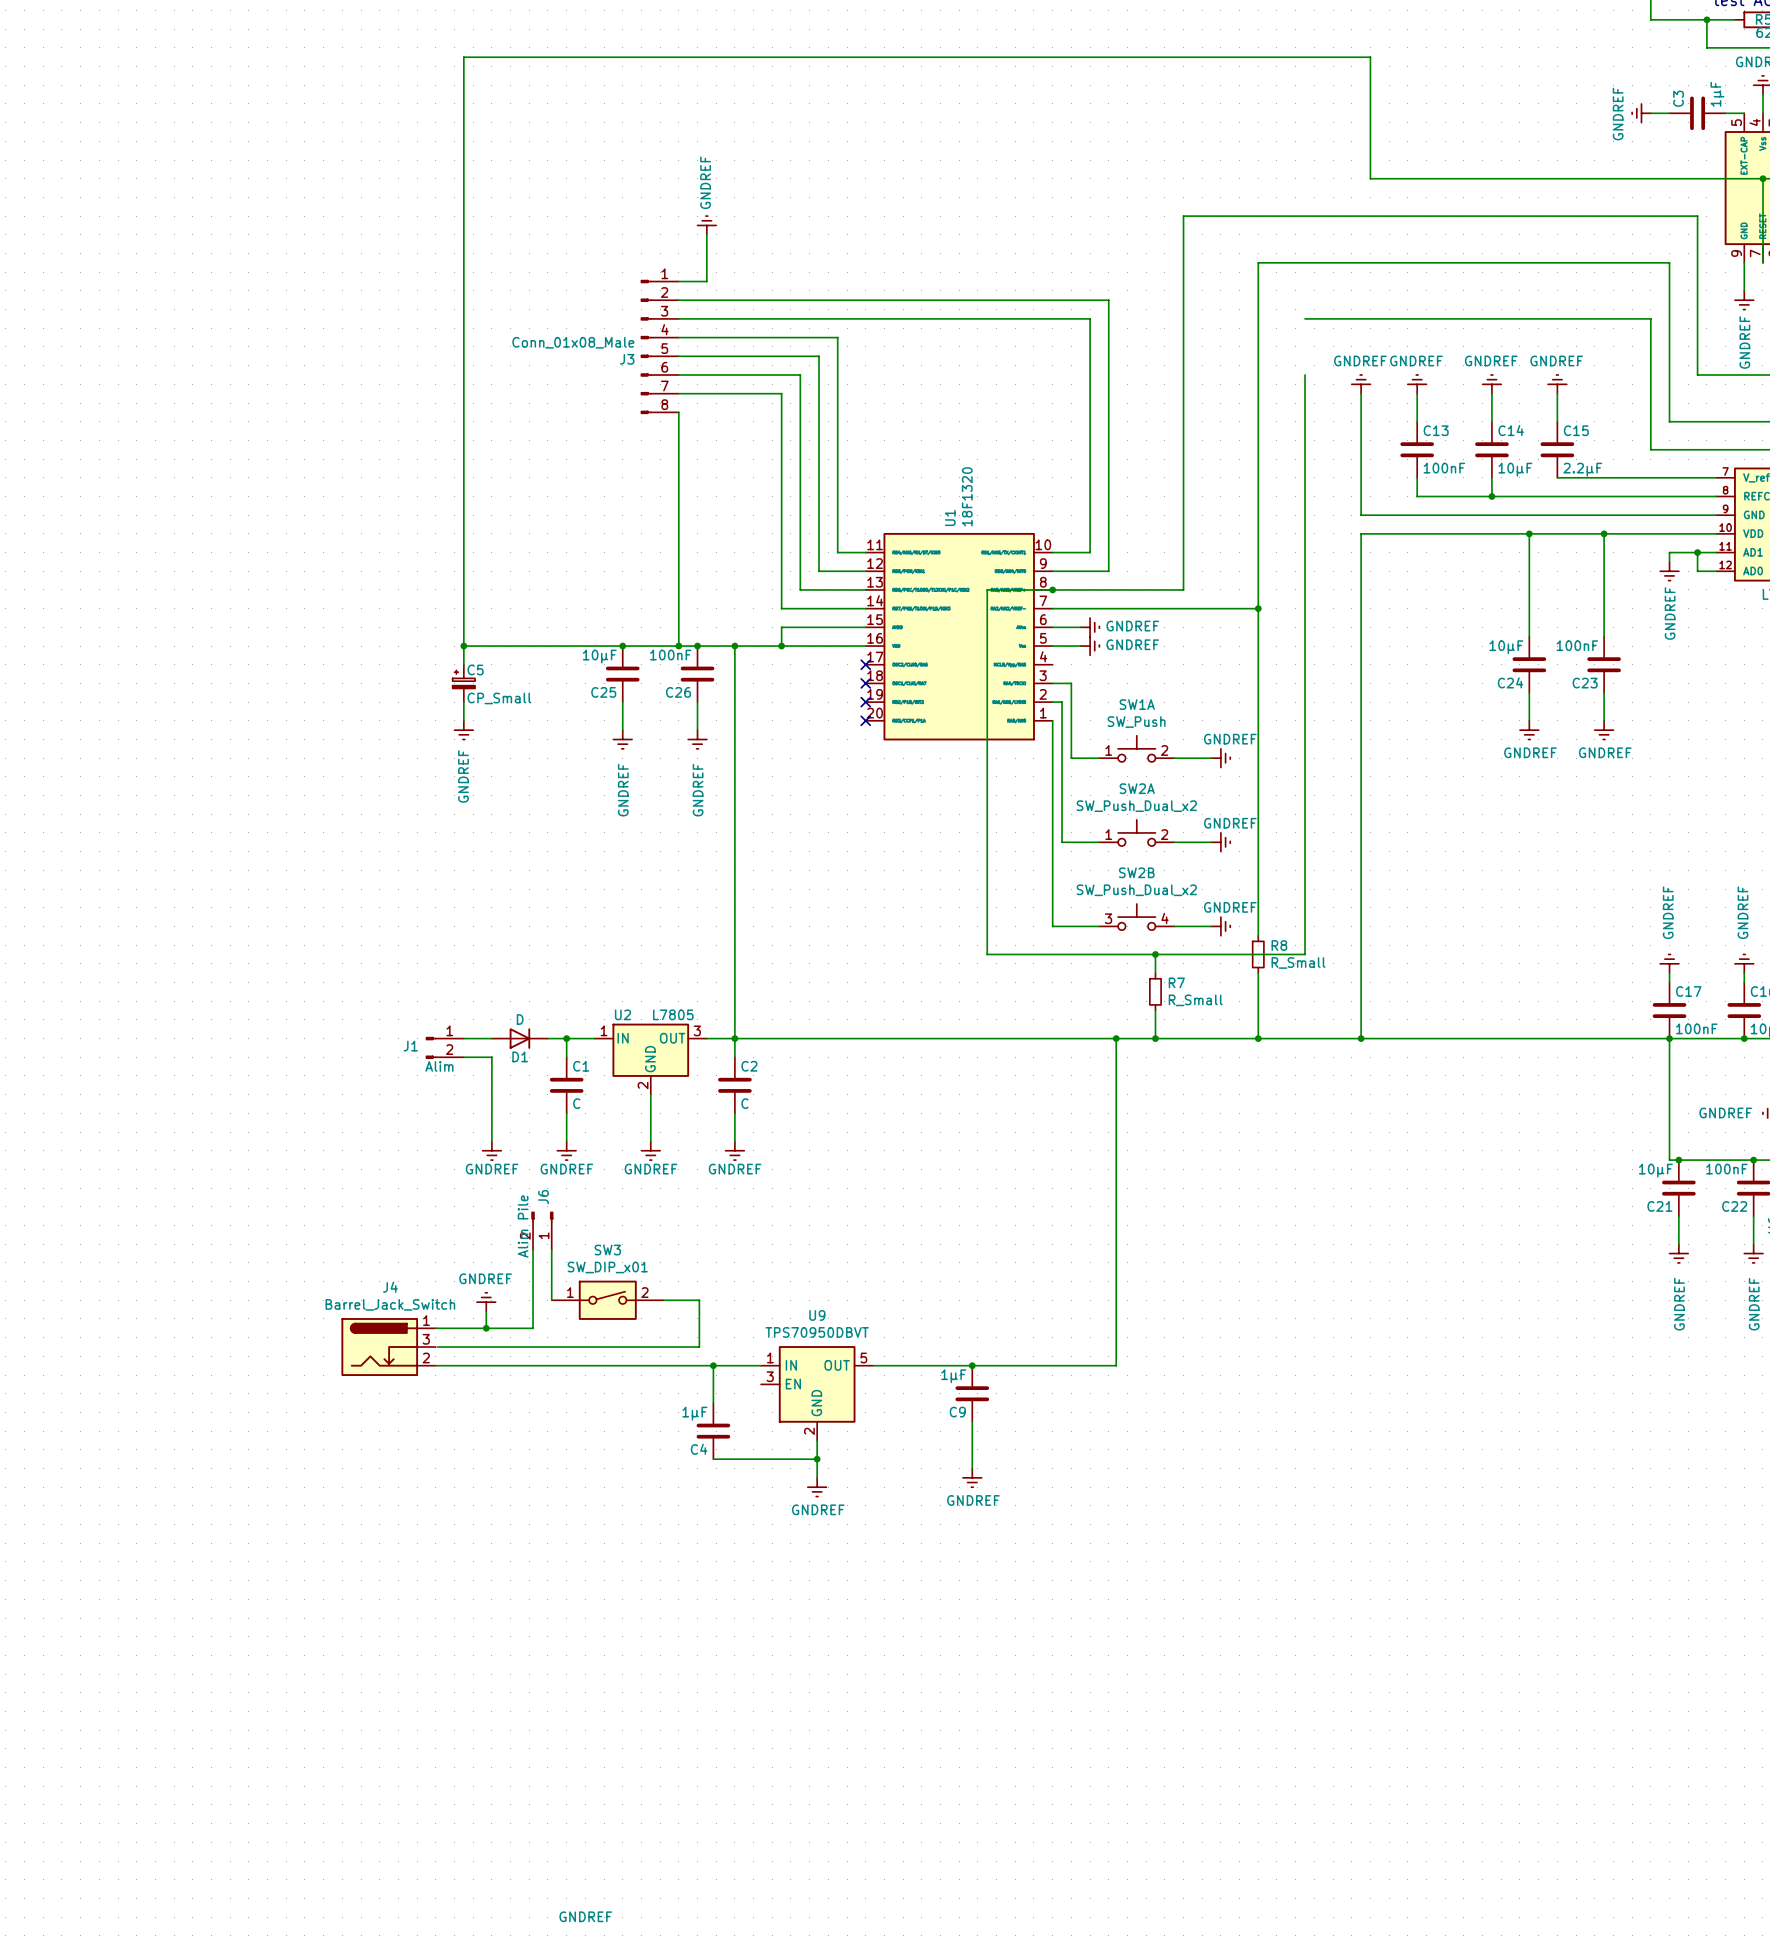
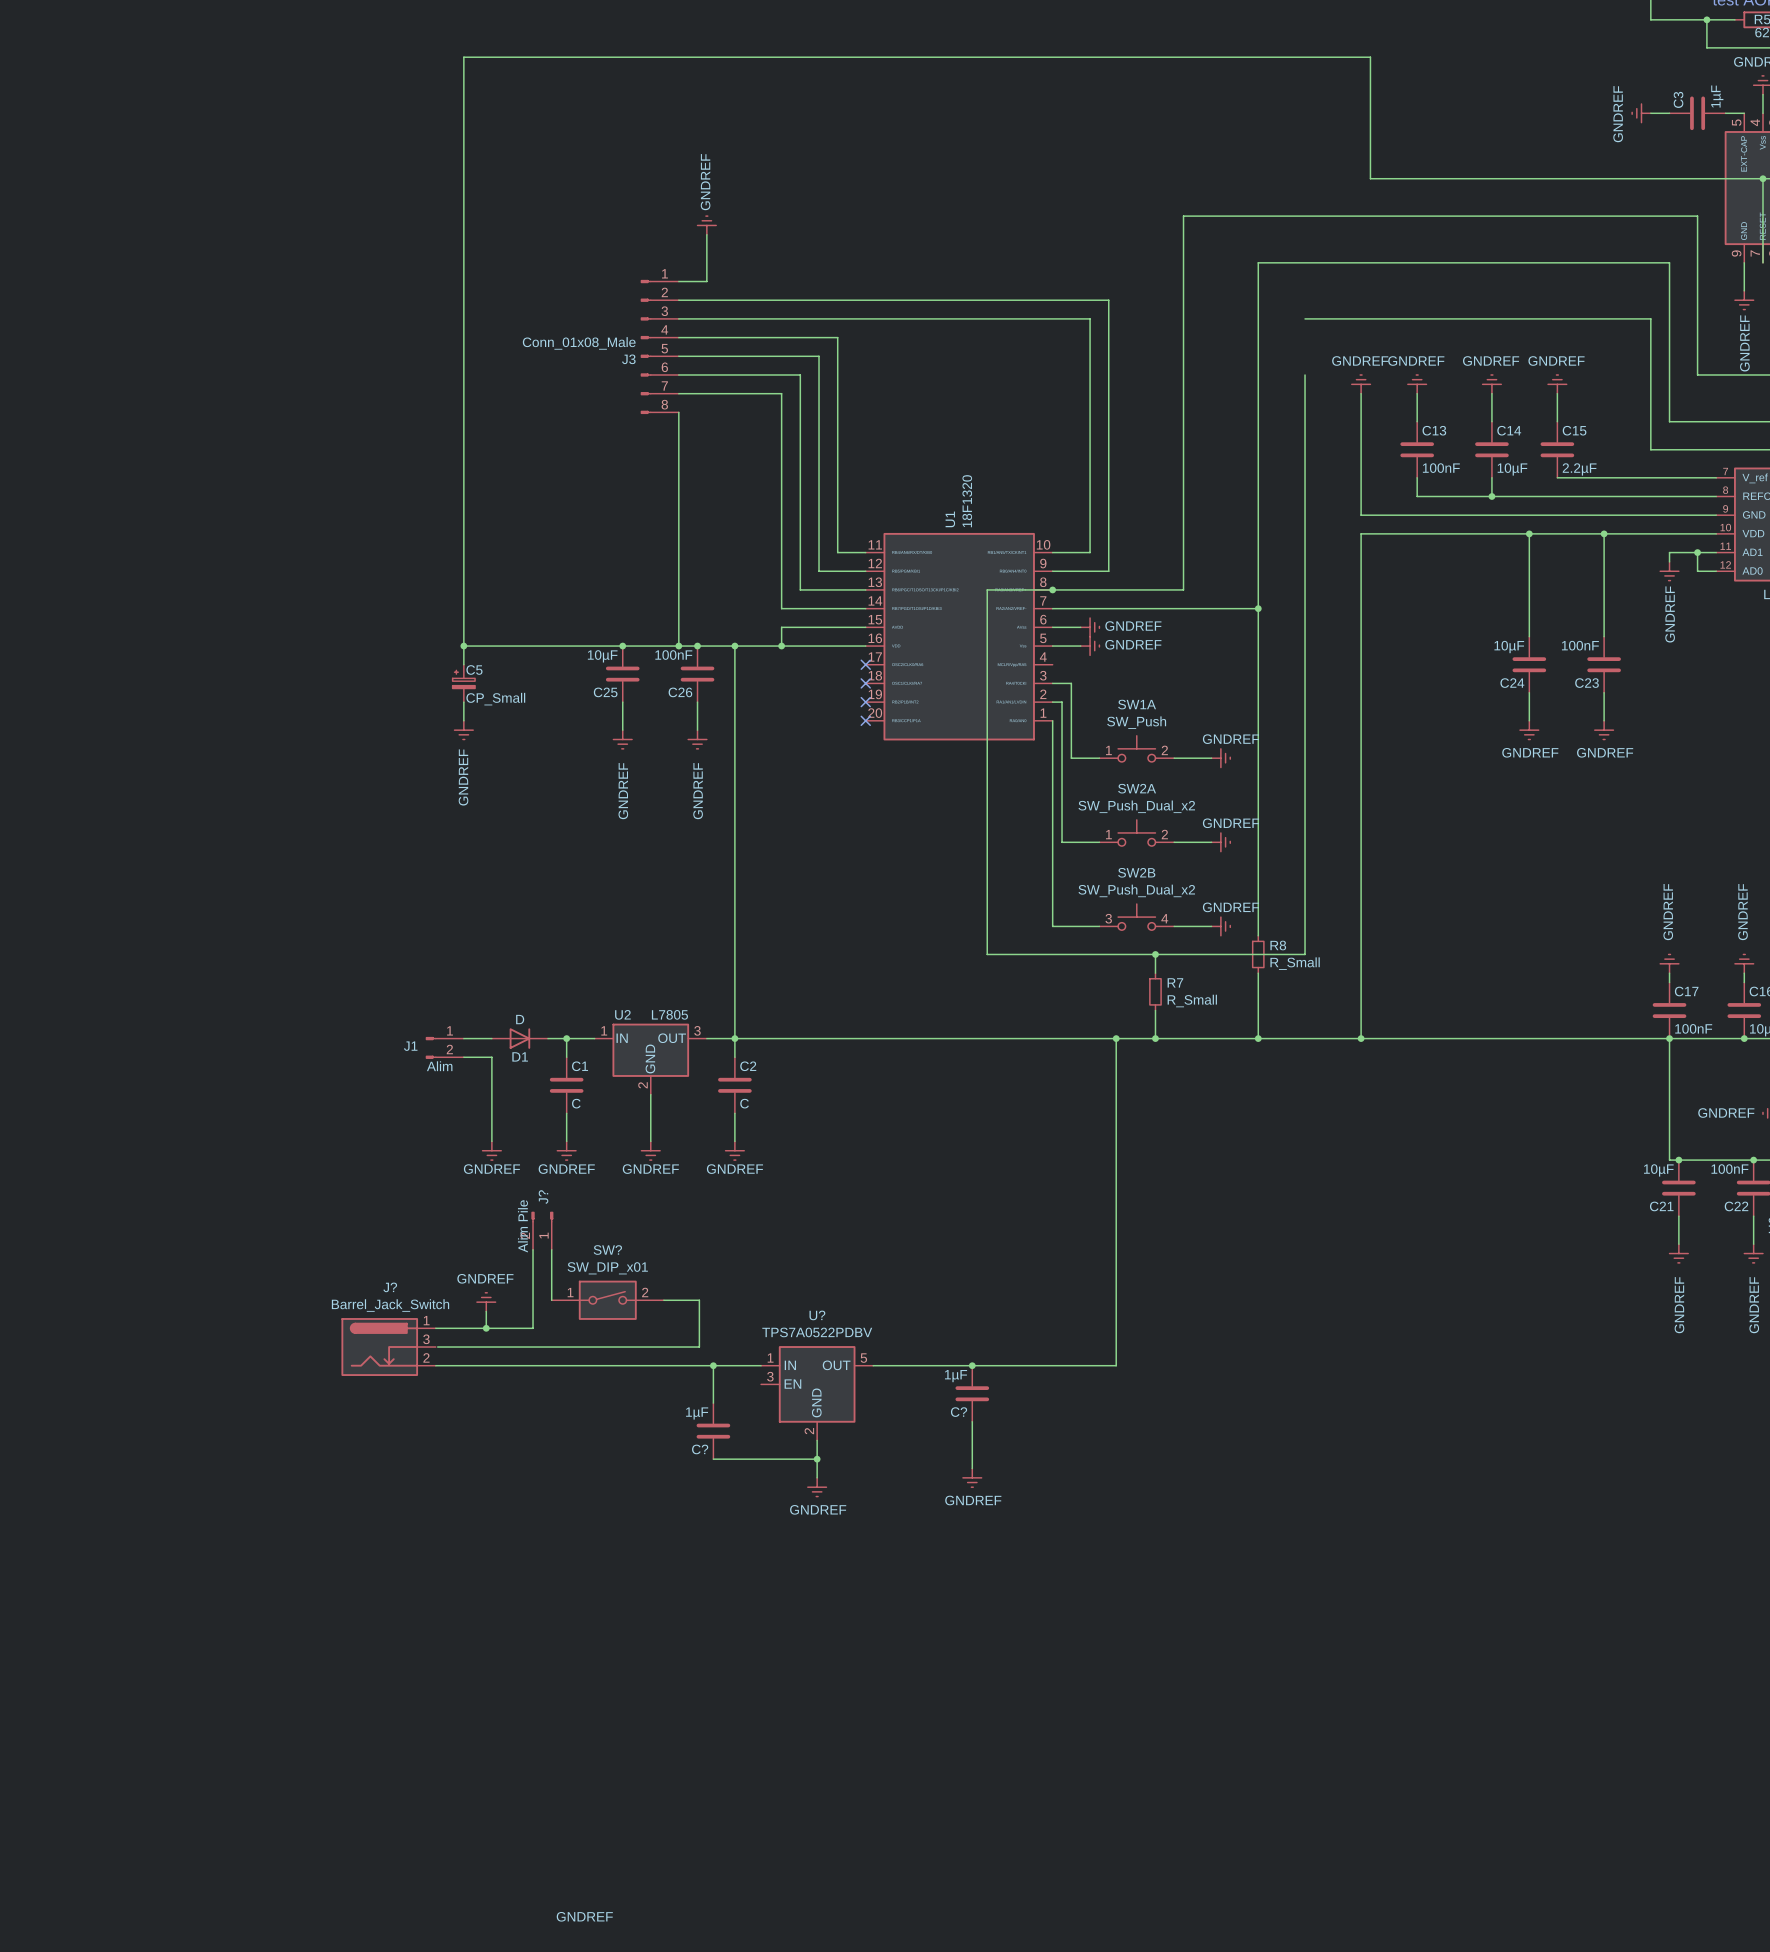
J6 name: J6 (543, 1197) -> J? (543, 1197)
SW3 name: SW3 (607, 1250) -> SW? (607, 1250)
J4 name: J4 (390, 1287) -> J? (390, 1287)
U9 name: U9 (817, 1315) -> U? (817, 1315)
U9 value: TPS70950DBVT (817, 1332) -> TPS7A0522PDBV (817, 1332)
C9 name: C9 (957, 1412) -> C? (959, 1412)
C4 name: C4 (699, 1449) -> C? (700, 1449)

